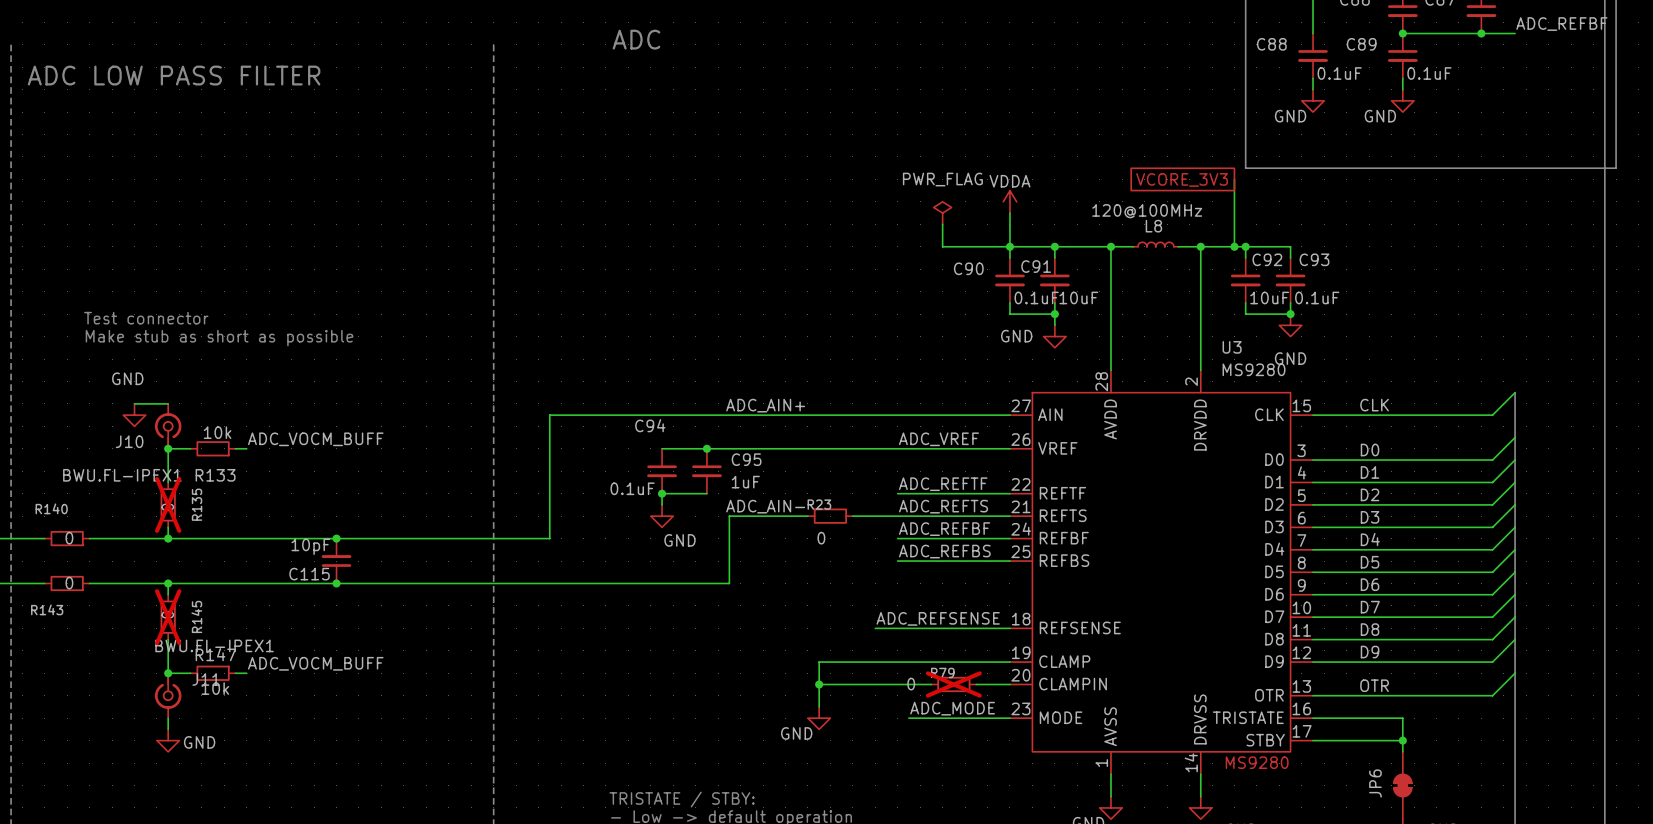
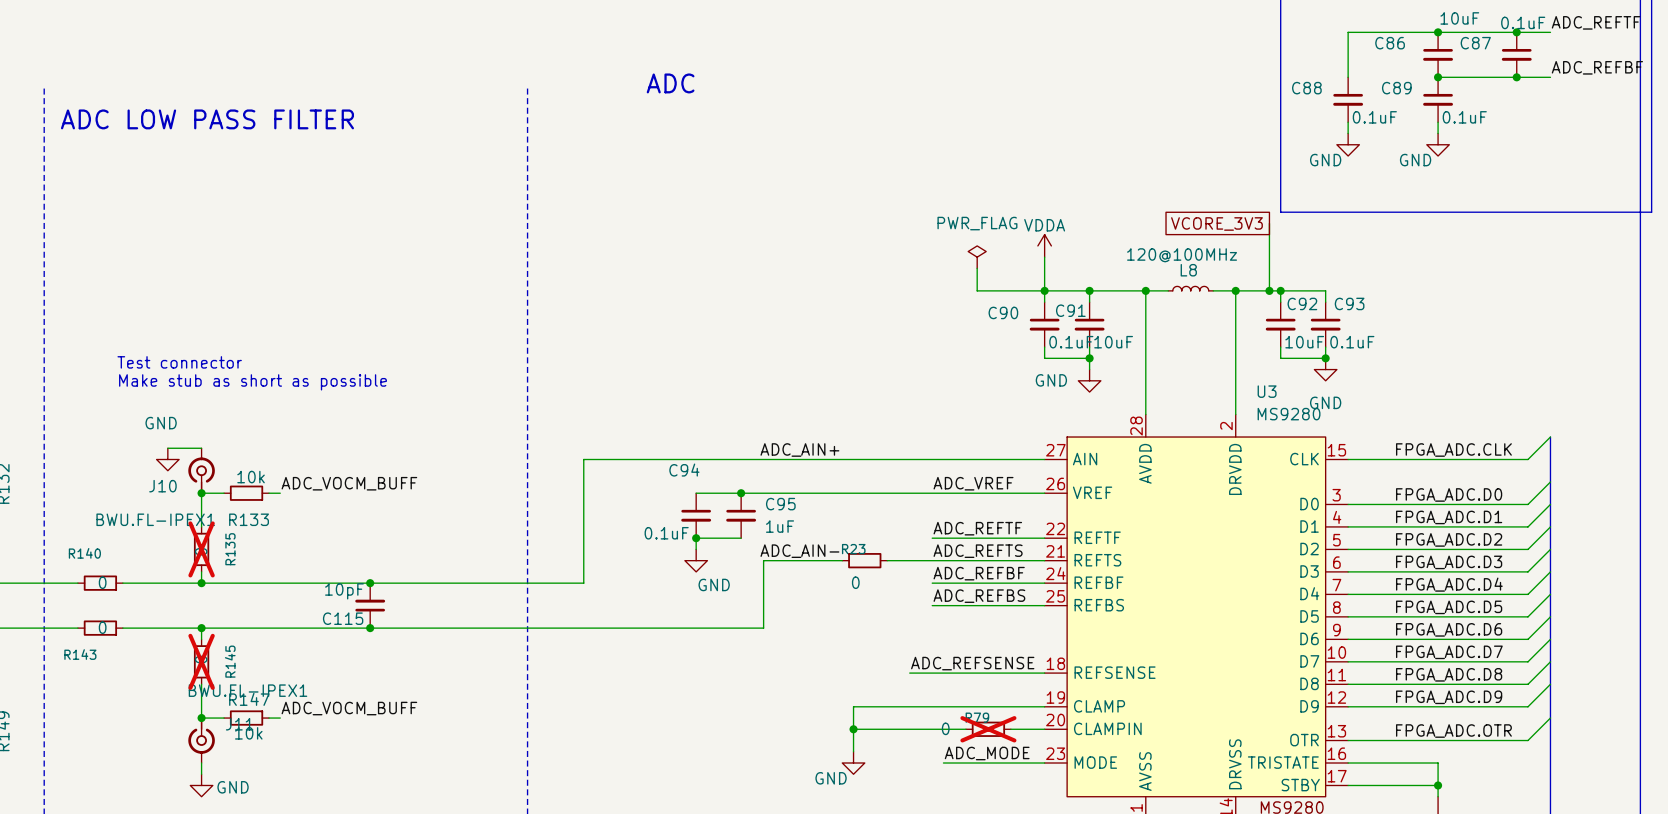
label: CLK (1374, 405) -> FPGA_ADC.CLK (1453, 450)
label: D0 (1370, 450) -> FPGA_ADC.D0 (1449, 494)
label: D1 (1370, 472) -> FPGA_ADC.D1 (1449, 517)
label: D2 (1370, 494) -> FPGA_ADC.D2 (1449, 539)
label: D3 (1370, 517) -> FPGA_ADC.D3 (1449, 562)
label: D4 (1370, 539) -> FPGA_ADC.D4 (1449, 584)
label: D5 (1370, 562) -> FPGA_ADC.D5 (1449, 607)
label: D6 (1370, 584) -> FPGA_ADC.D6 (1449, 629)
label: D7 (1370, 607) -> FPGA_ADC.D7 (1449, 652)
label: D8 (1370, 629) -> FPGA_ADC.D8 (1449, 674)
label: D9 (1370, 652) -> FPGA_ADC.D9 (1449, 697)
label: OTR (1374, 685) -> FPGA_ADC.OTR (1453, 731)

